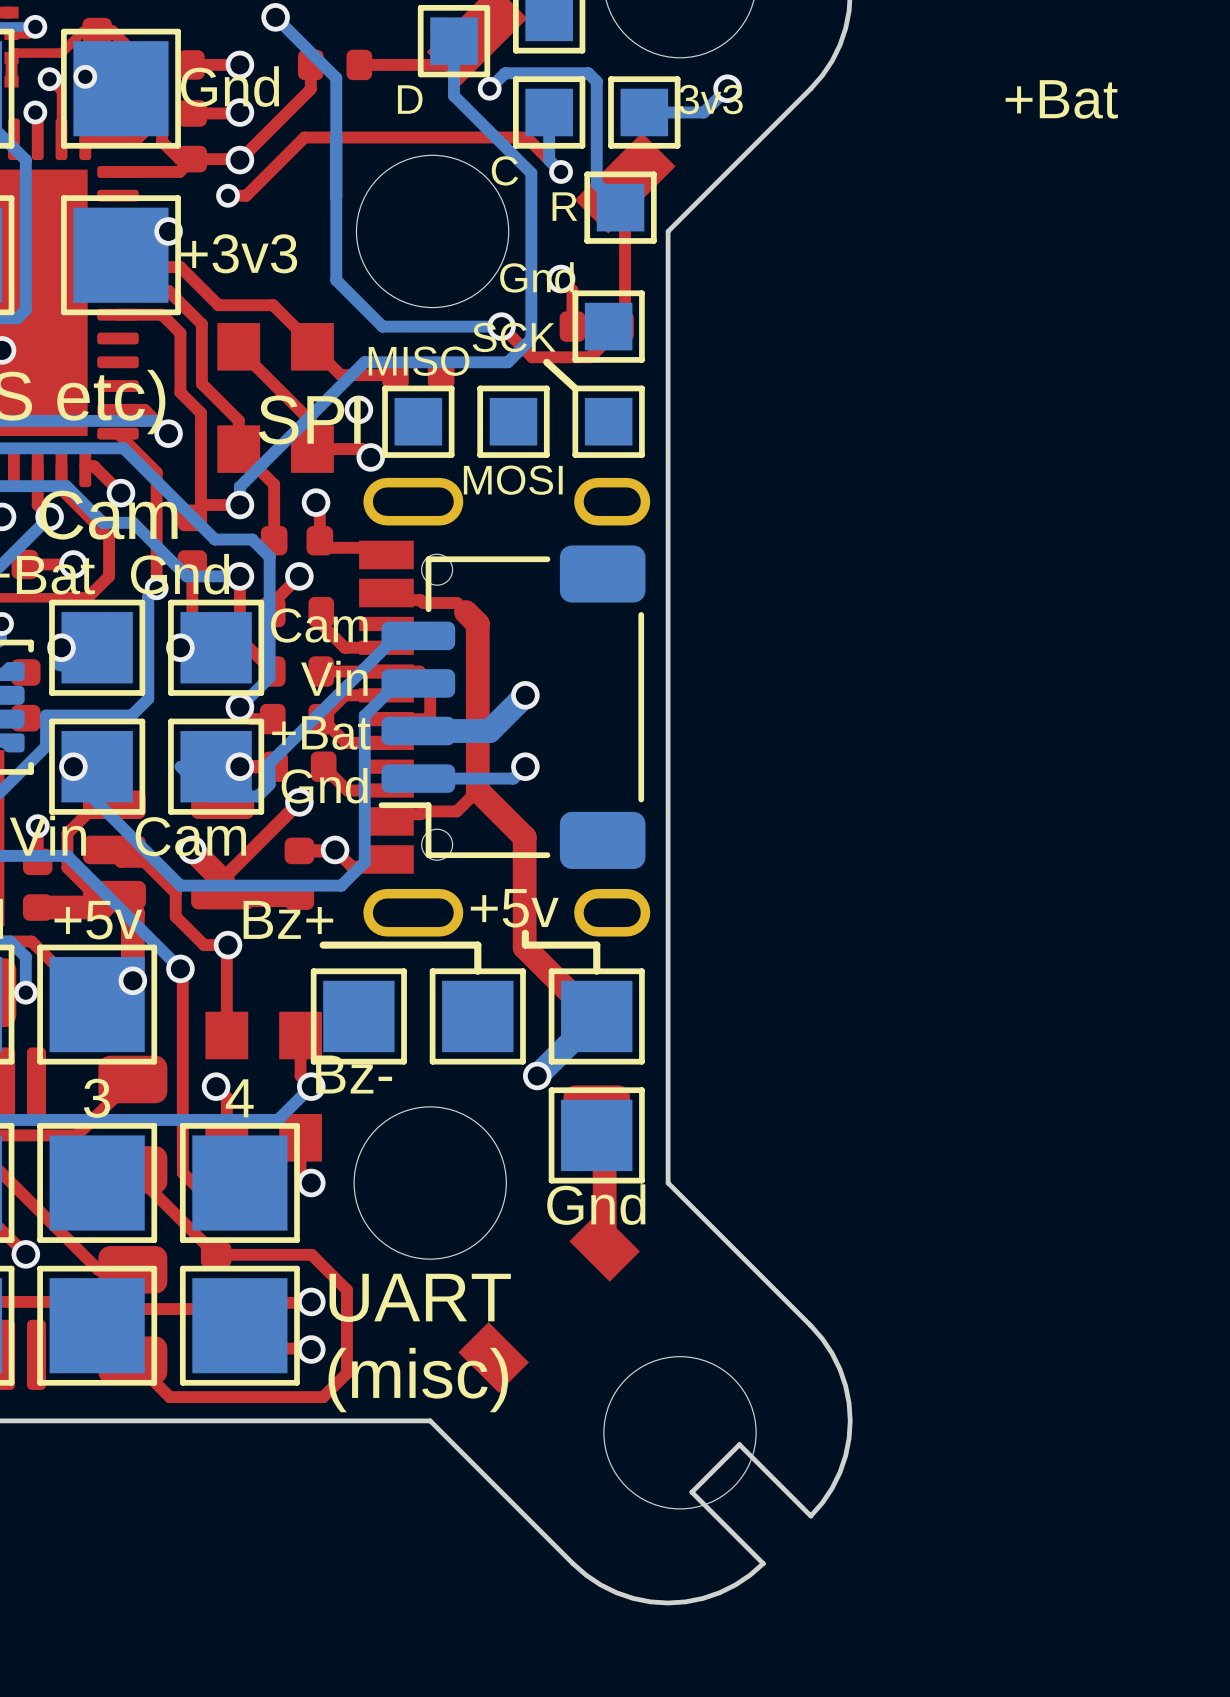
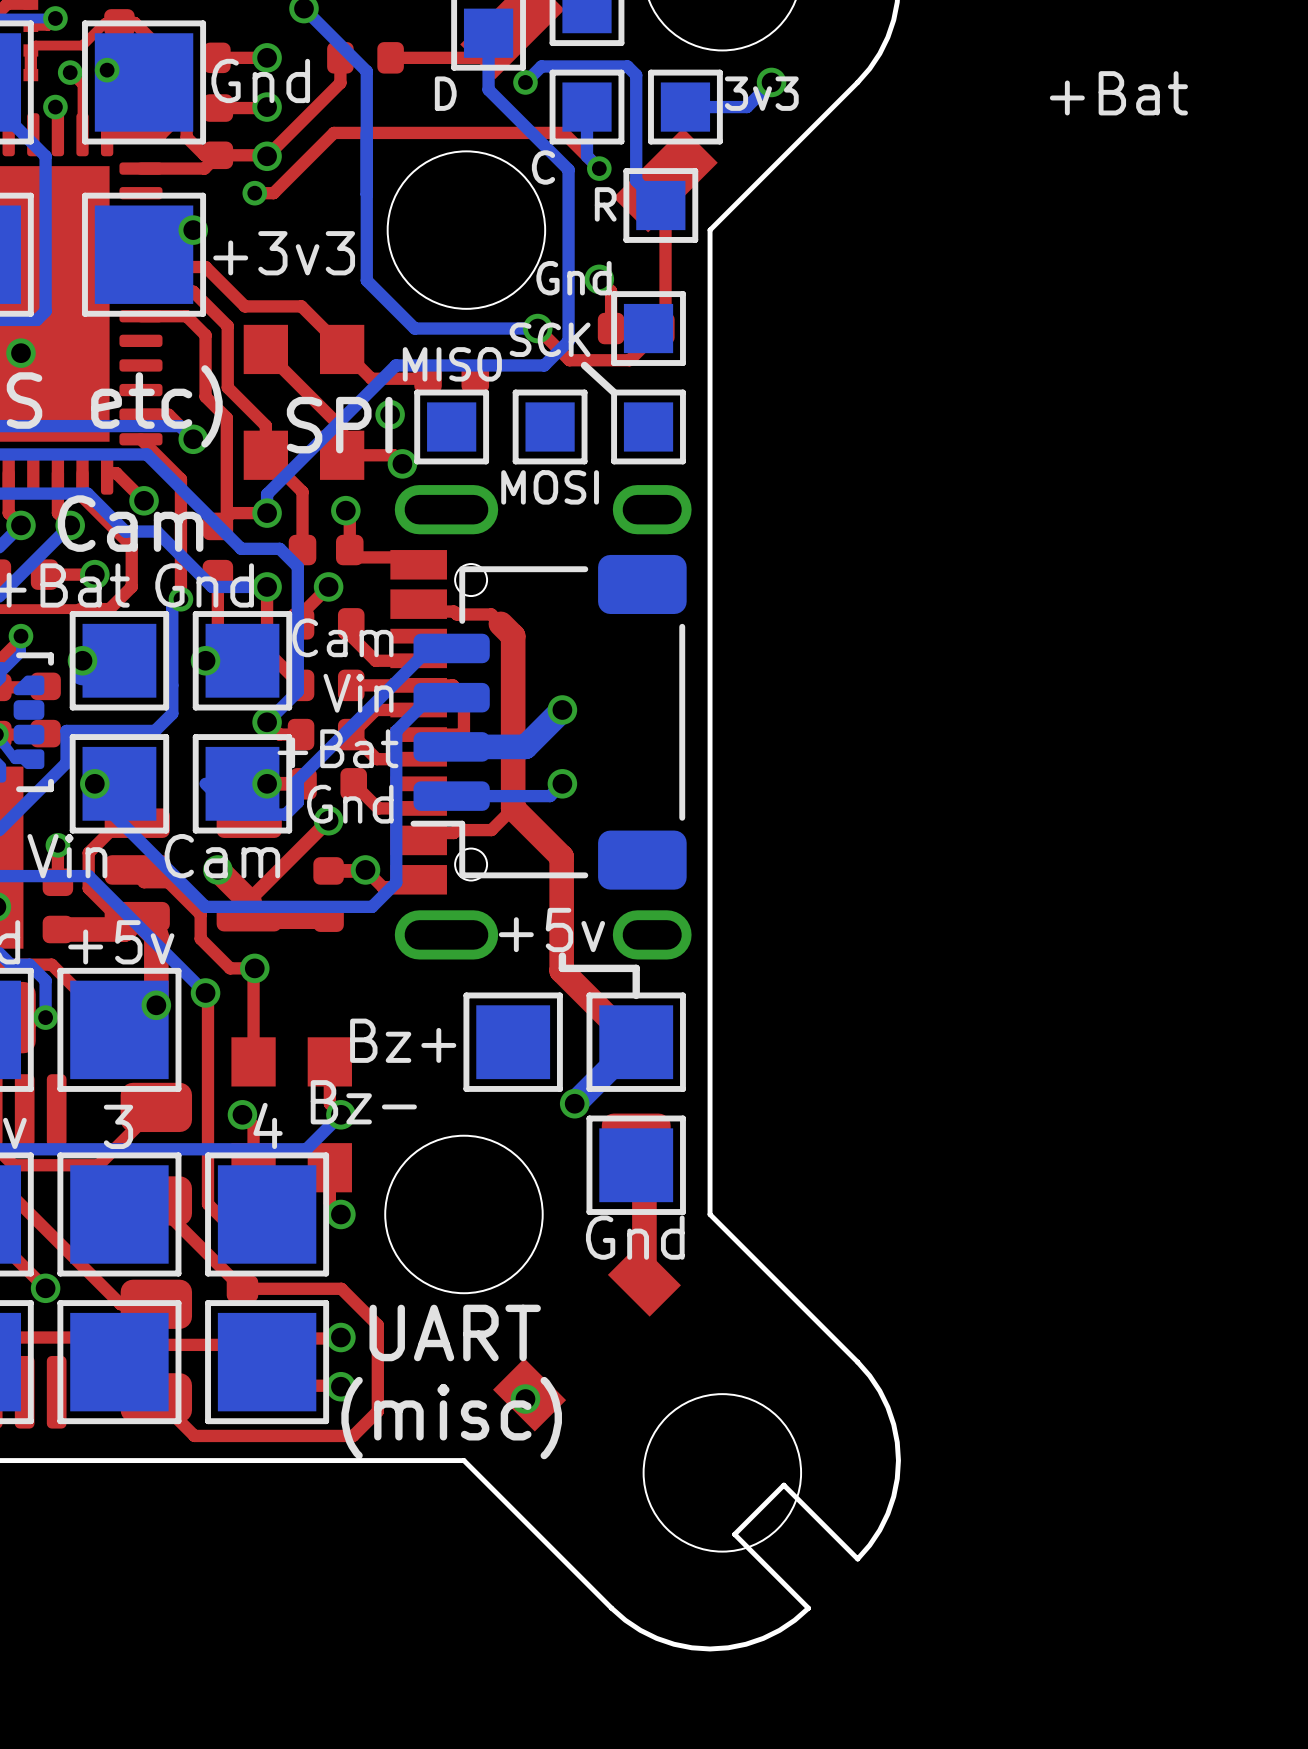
text position: Bz+ (288, 919) -> Bz+ (403, 1040)
line: (323, 945) (477, 945) (477, 971) -> none
part: (358, 1016) -> none
via: none -> (525, 1399)

